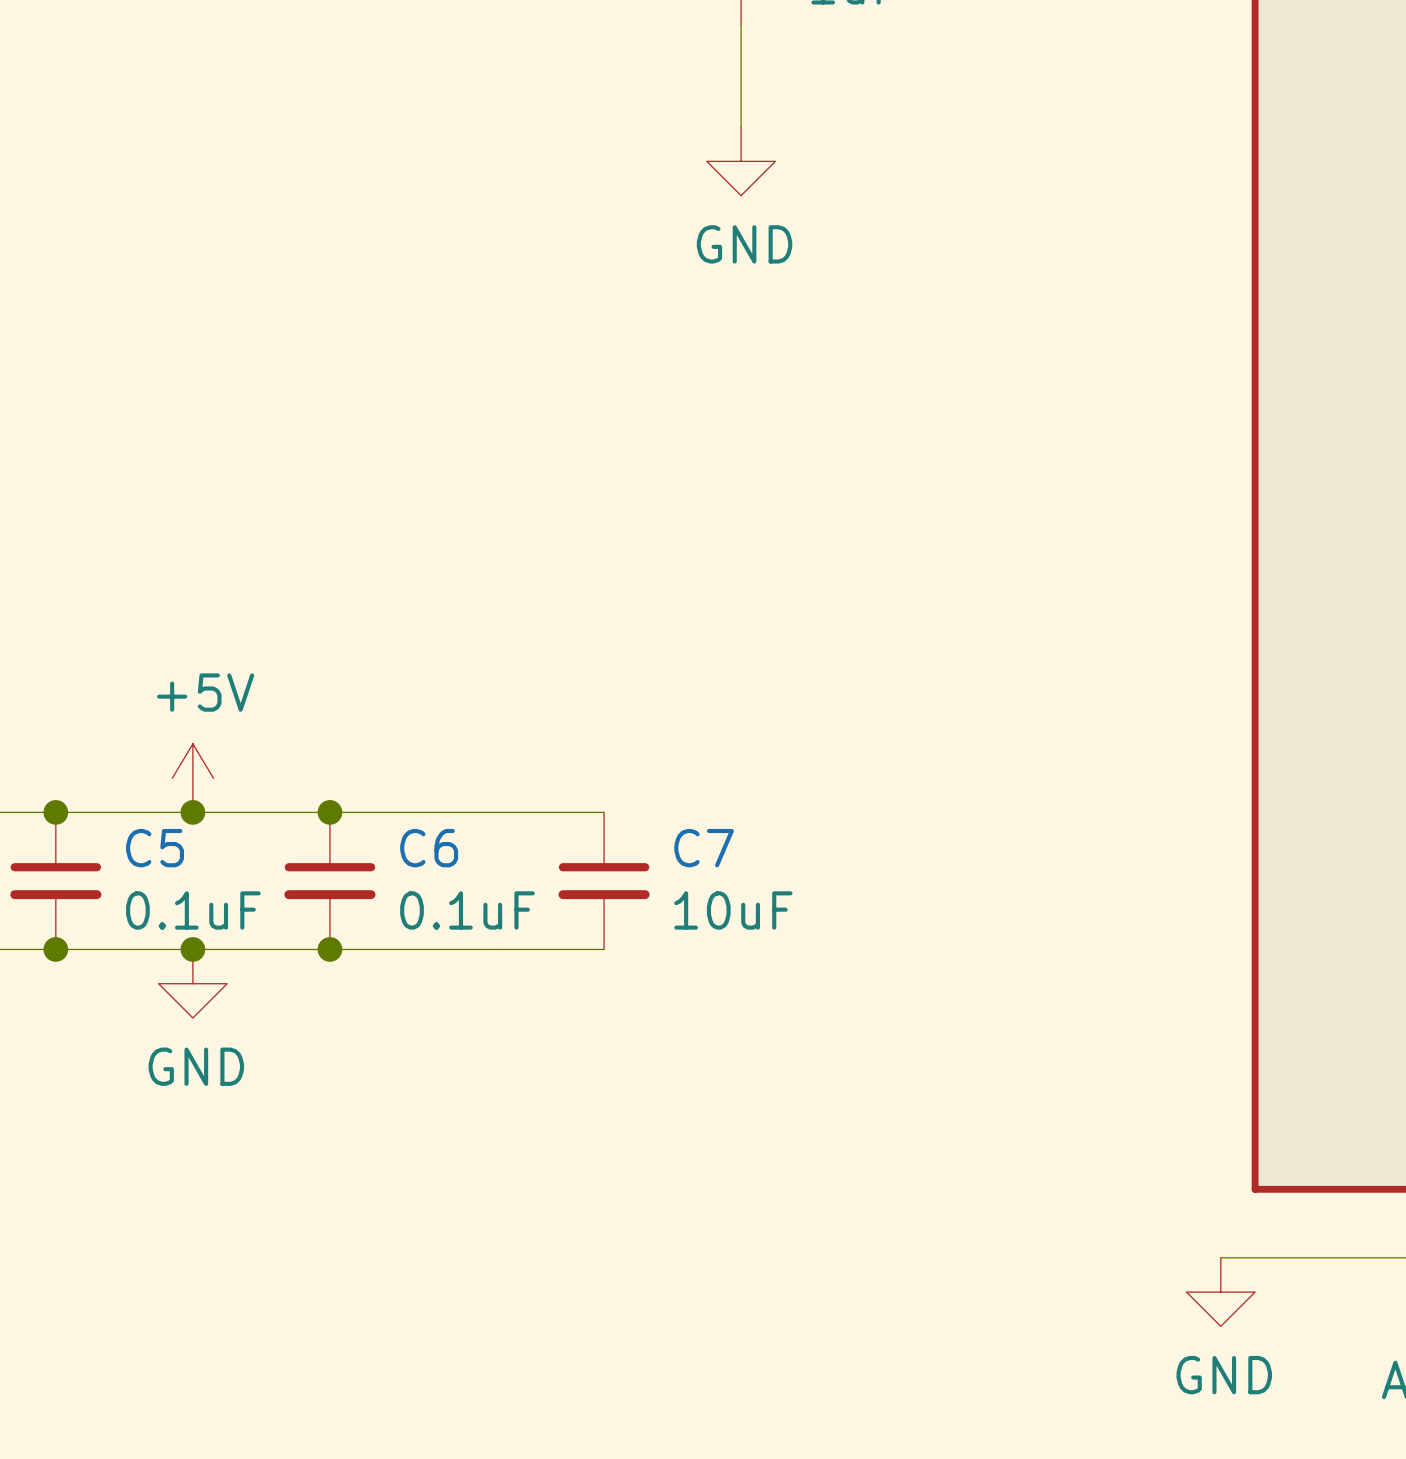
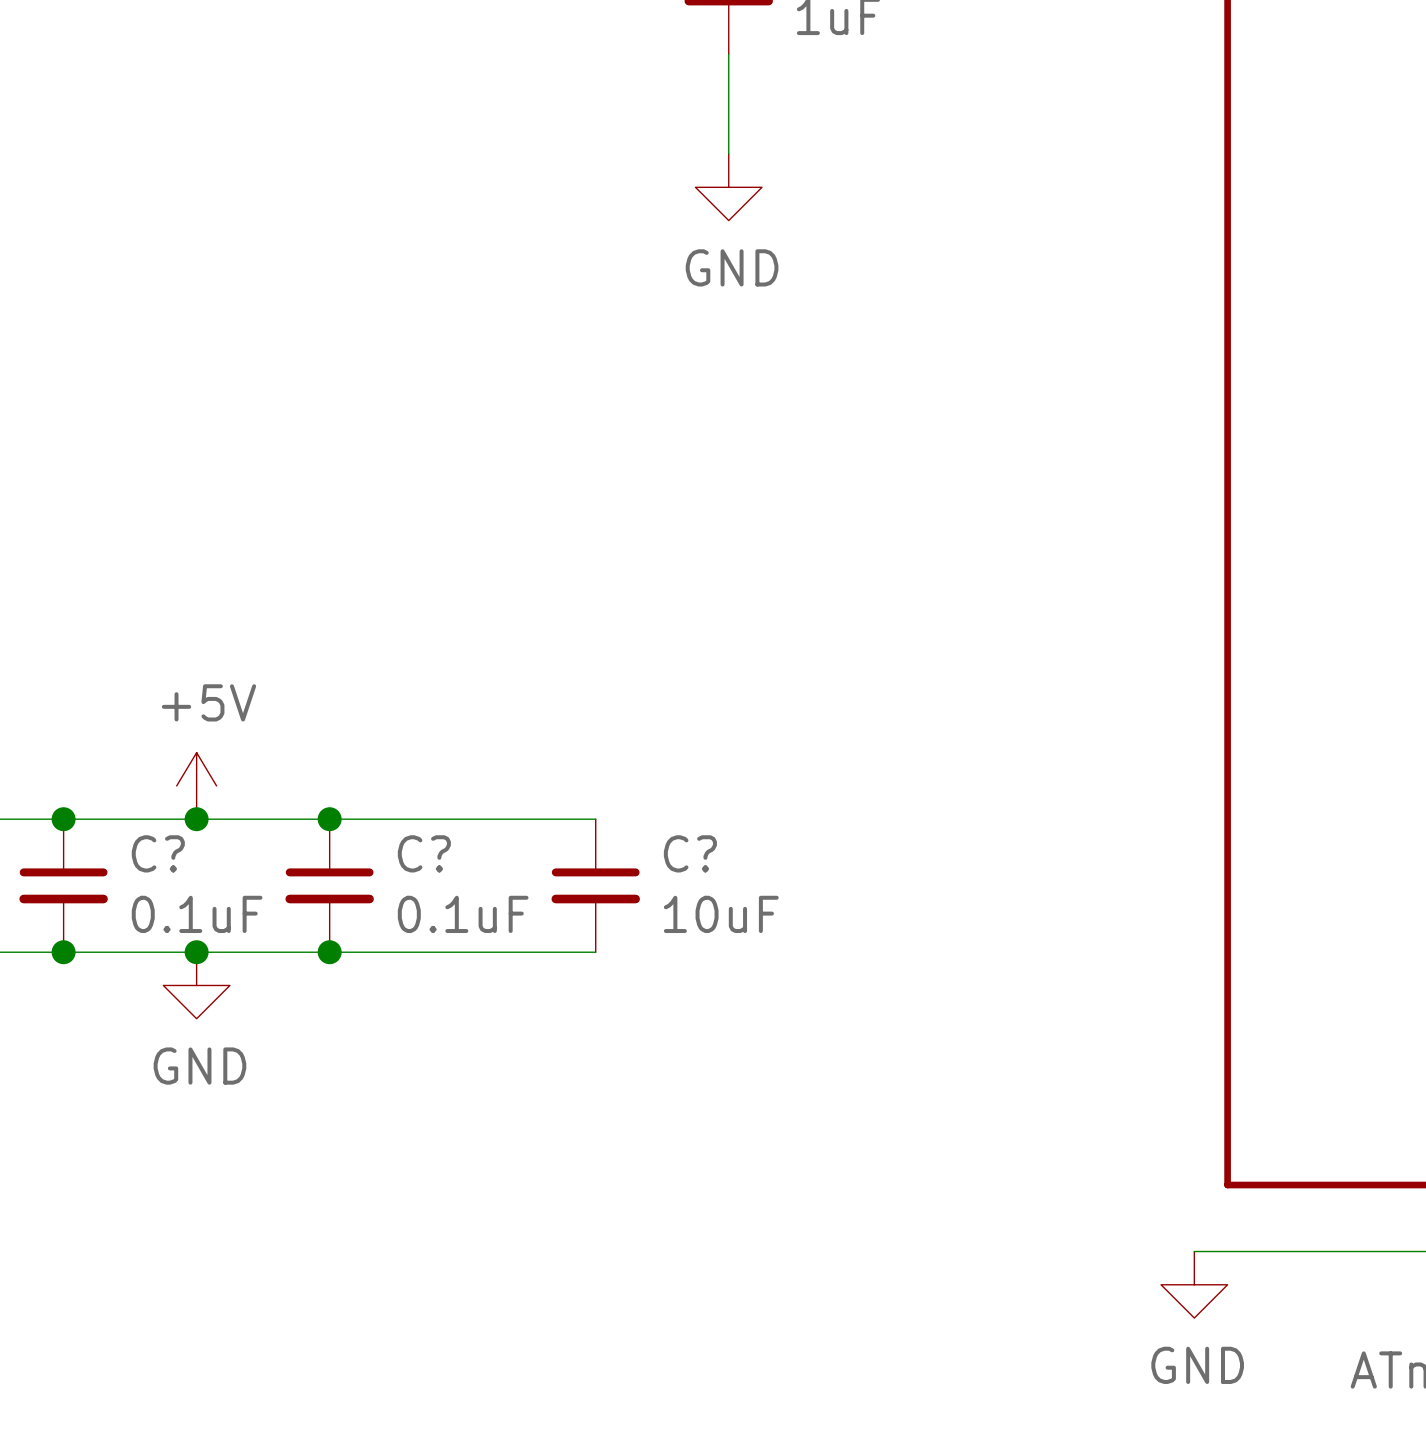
C5 name: C5 (155, 848) -> C? (158, 853)
C6 name: C6 (429, 848) -> C? (424, 853)
C7 name: C7 (704, 848) -> C? (690, 853)

